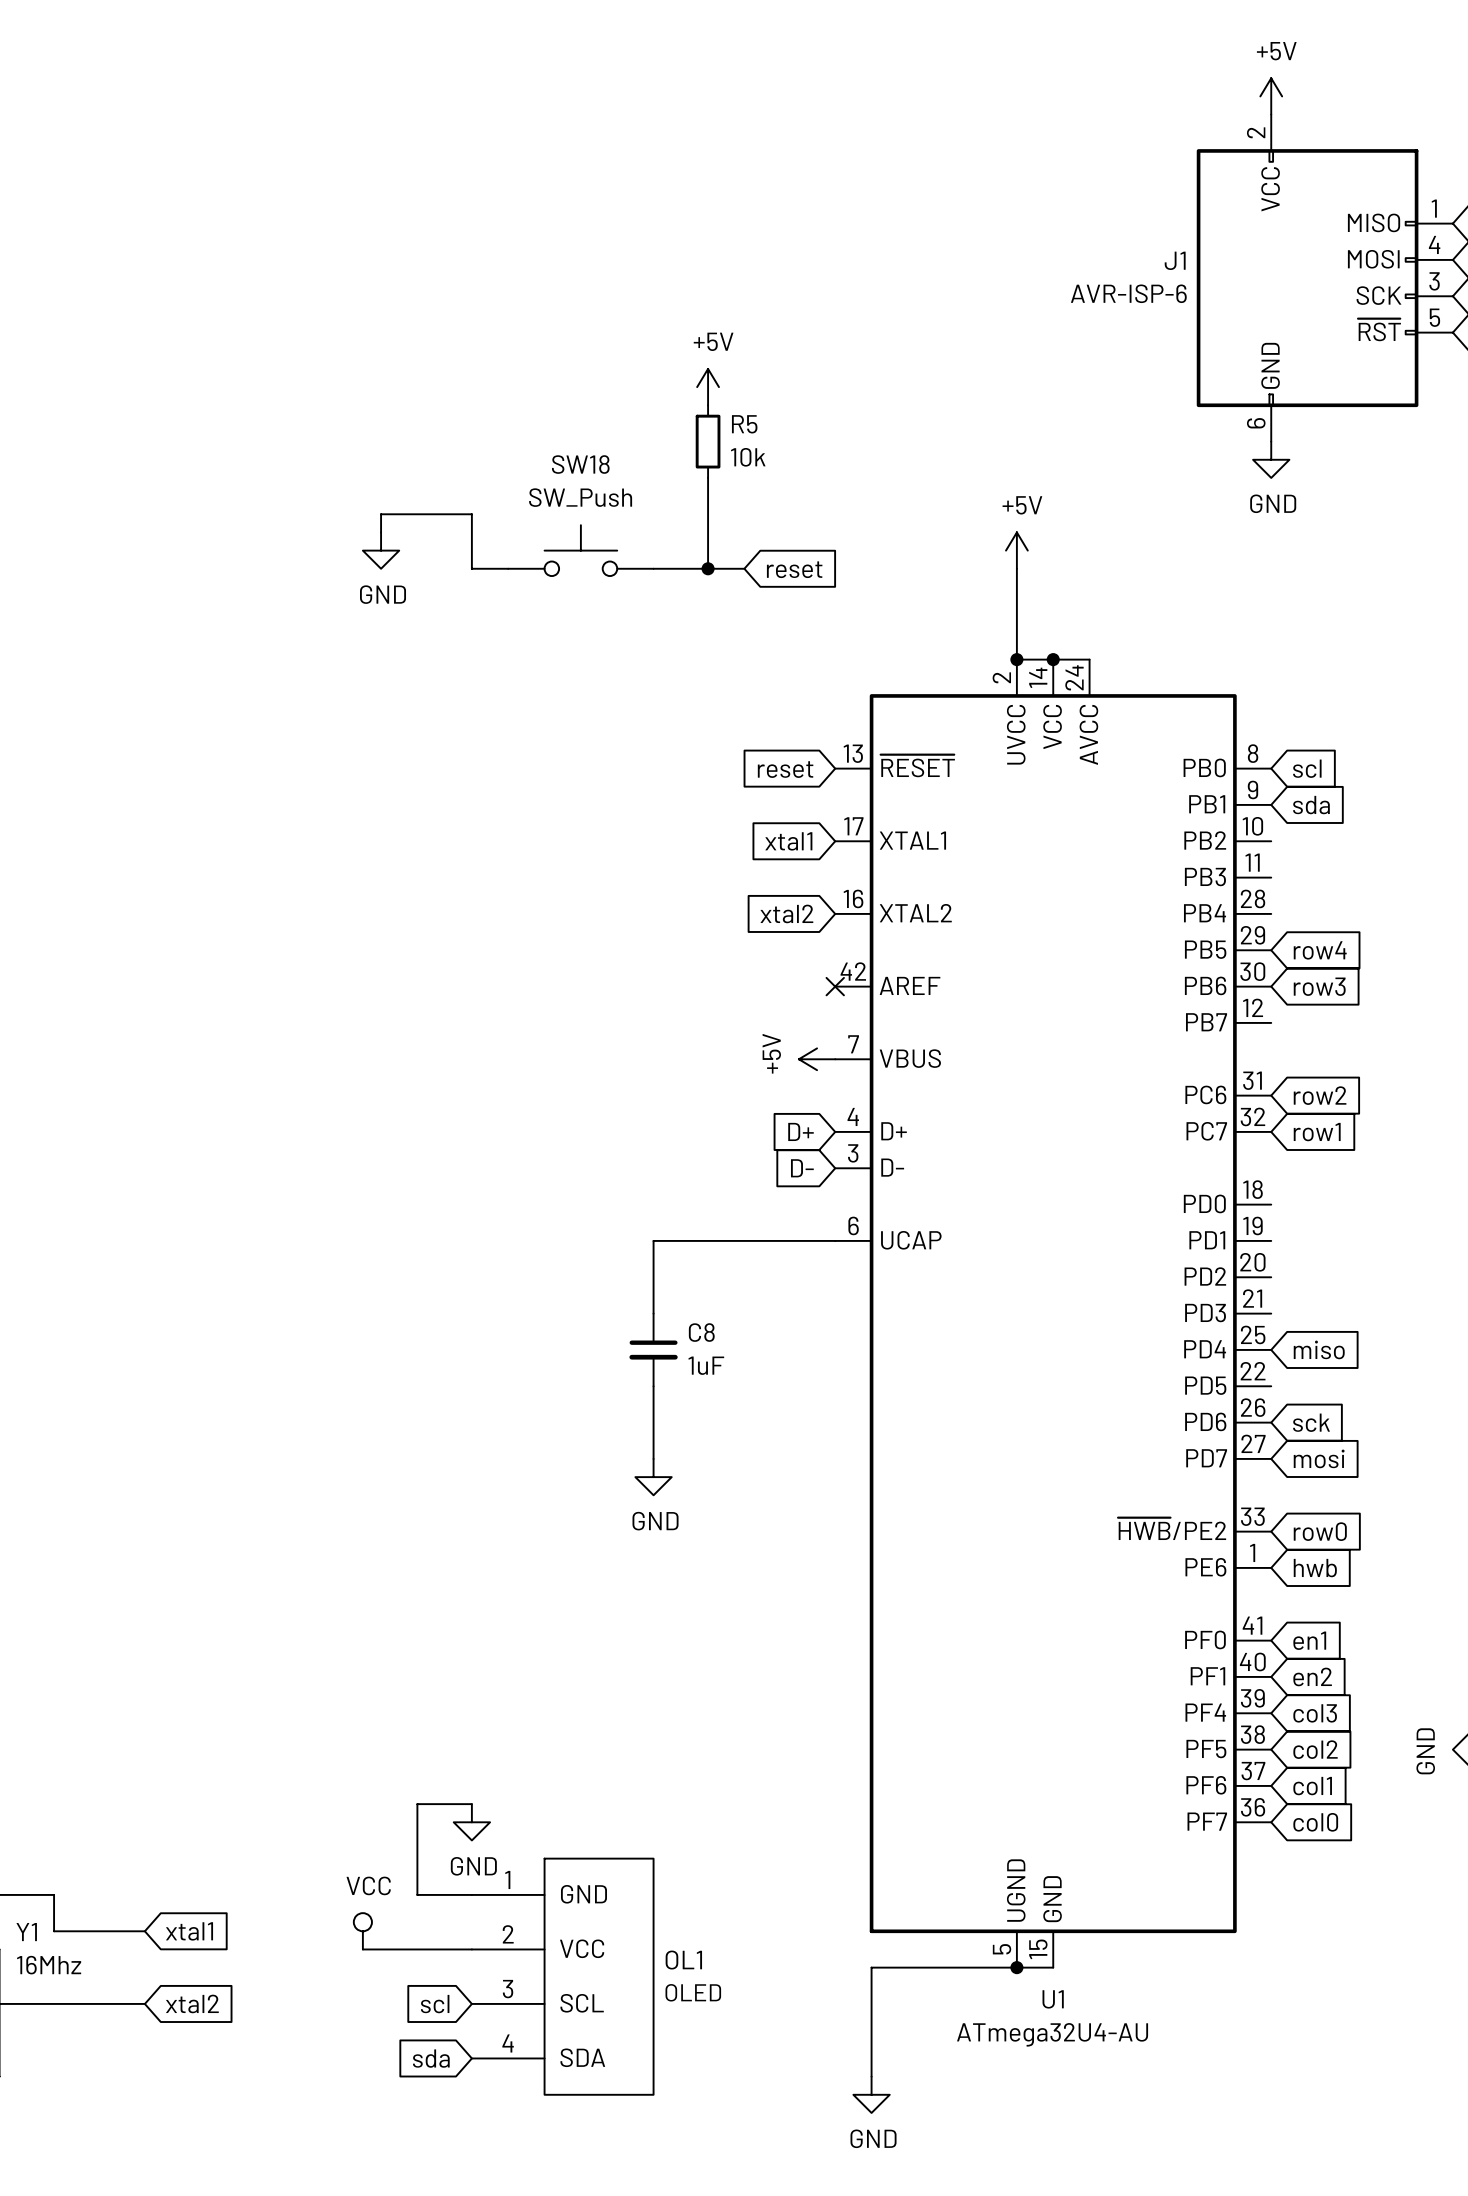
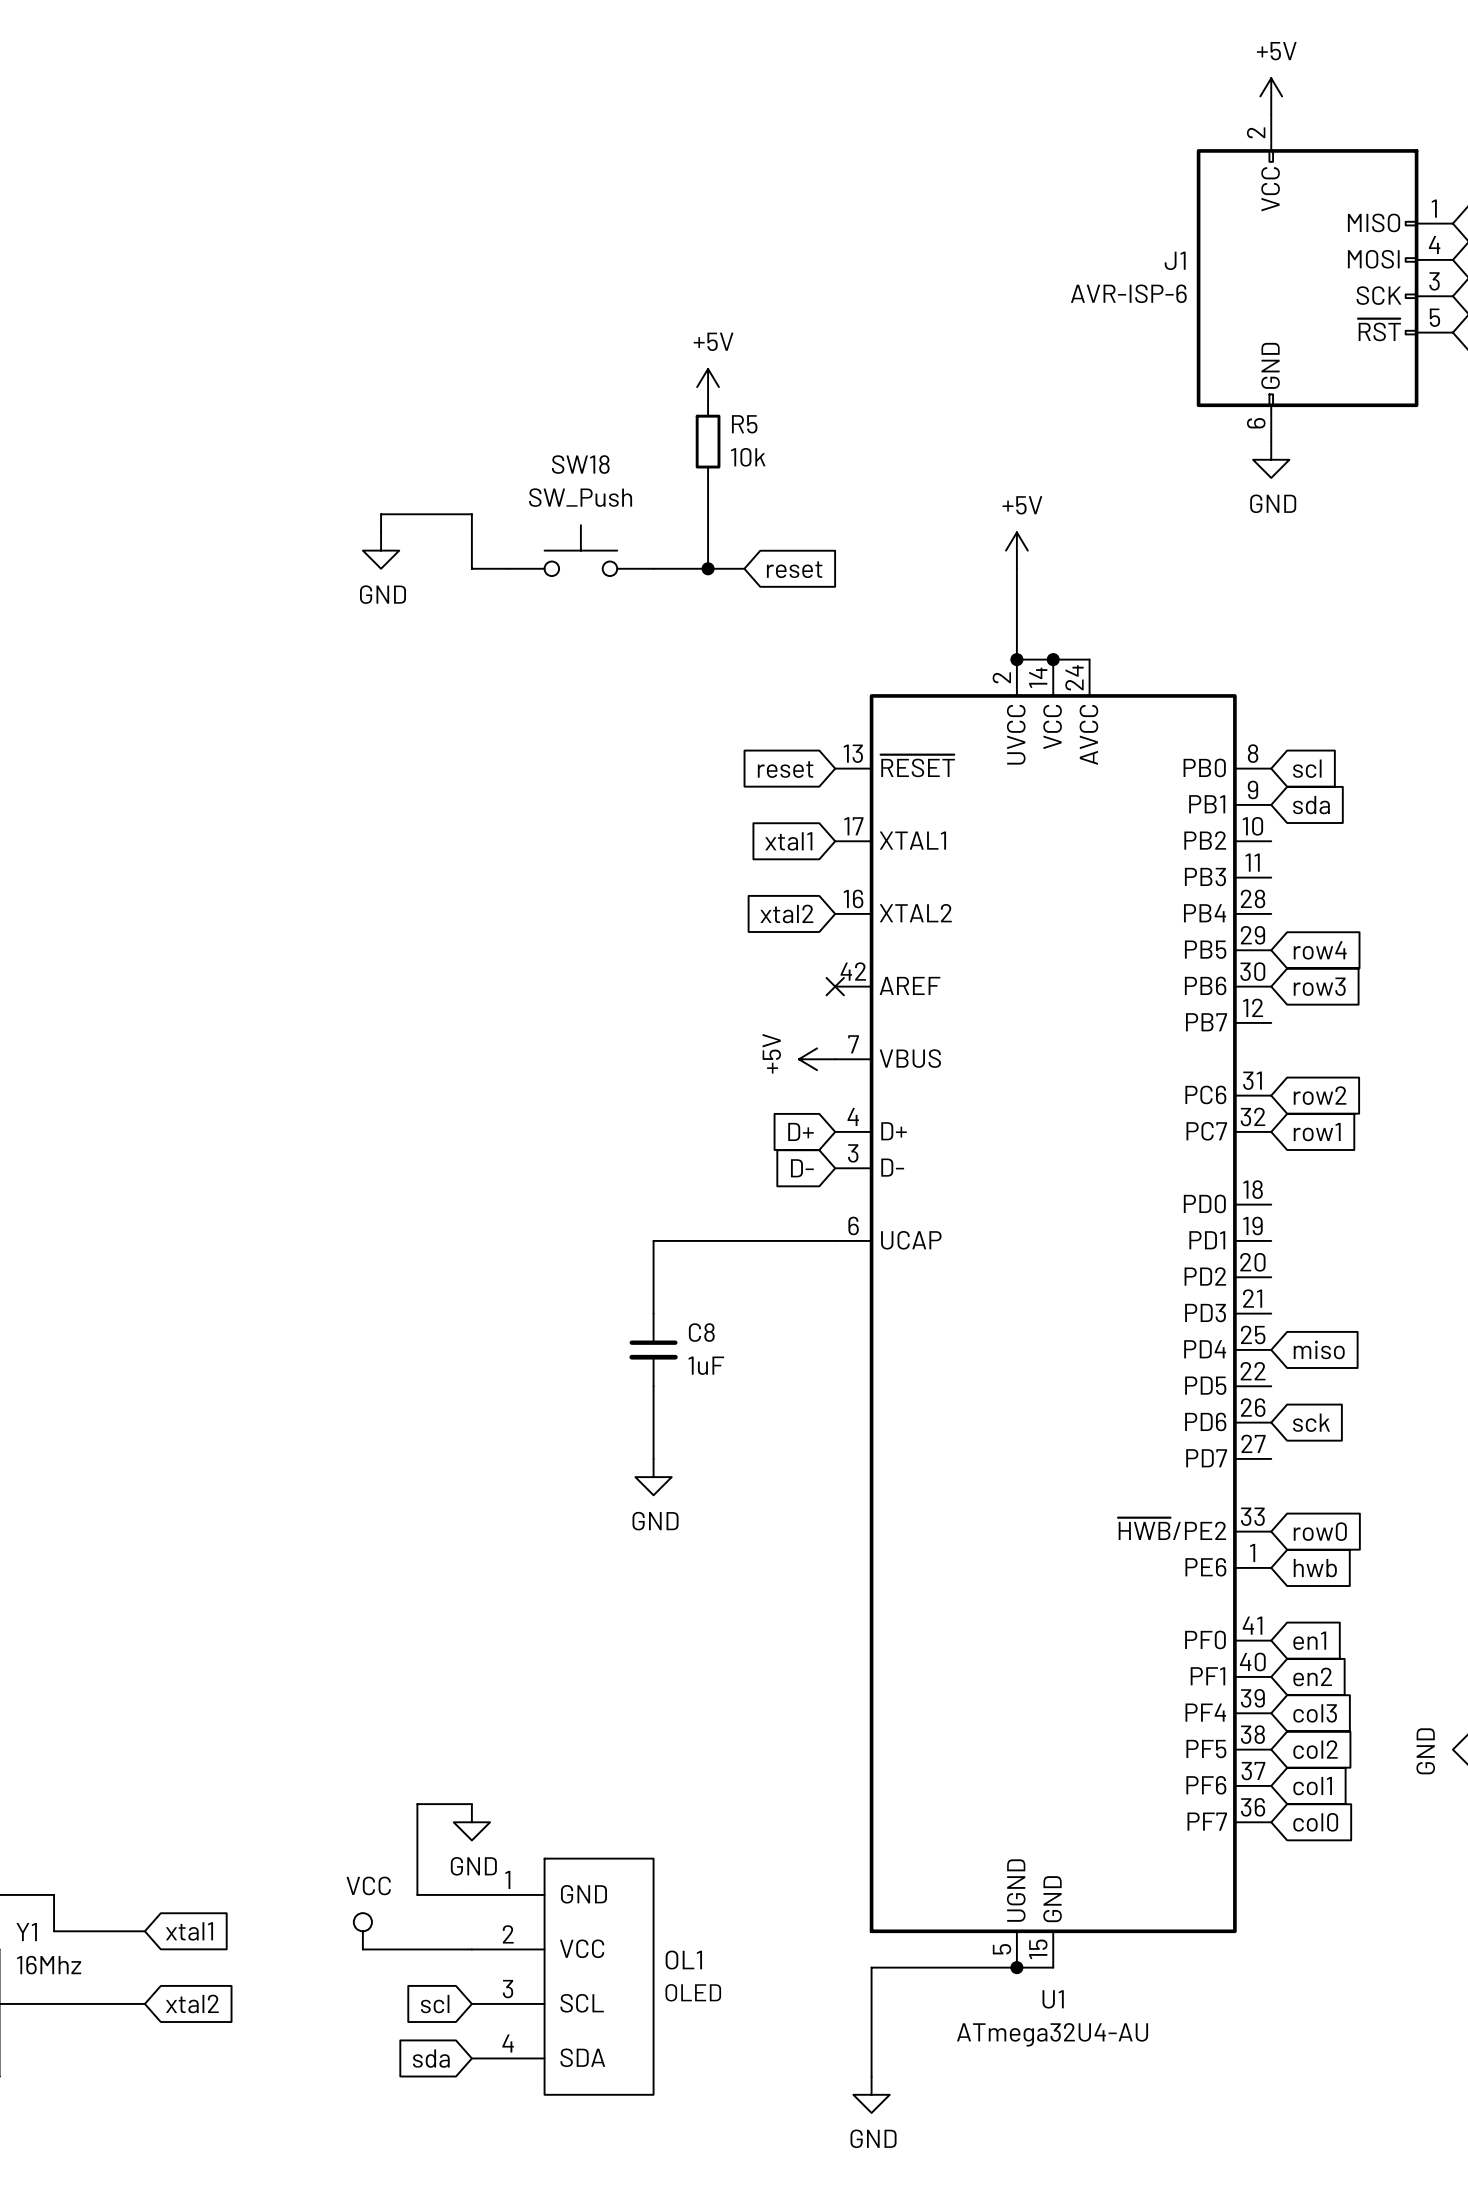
global label: mosi (1319, 1458) -> none

